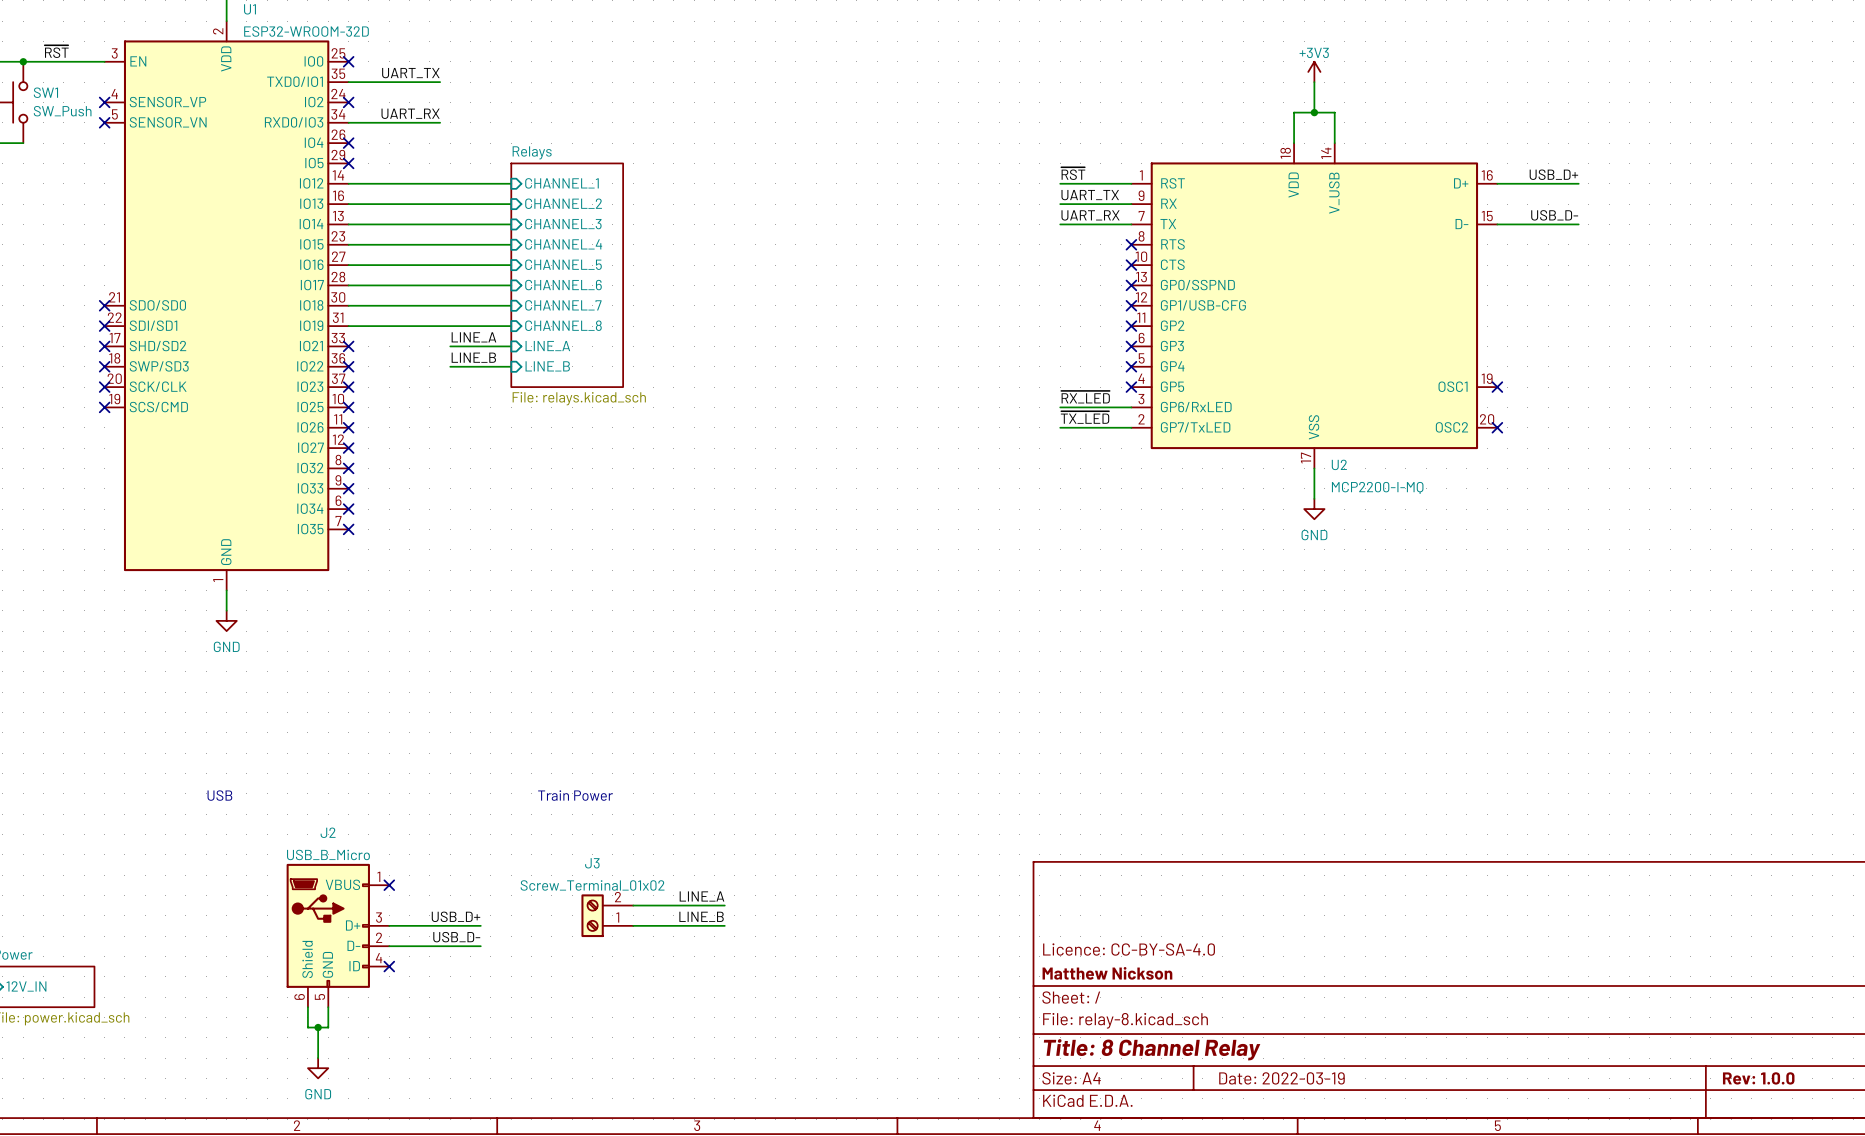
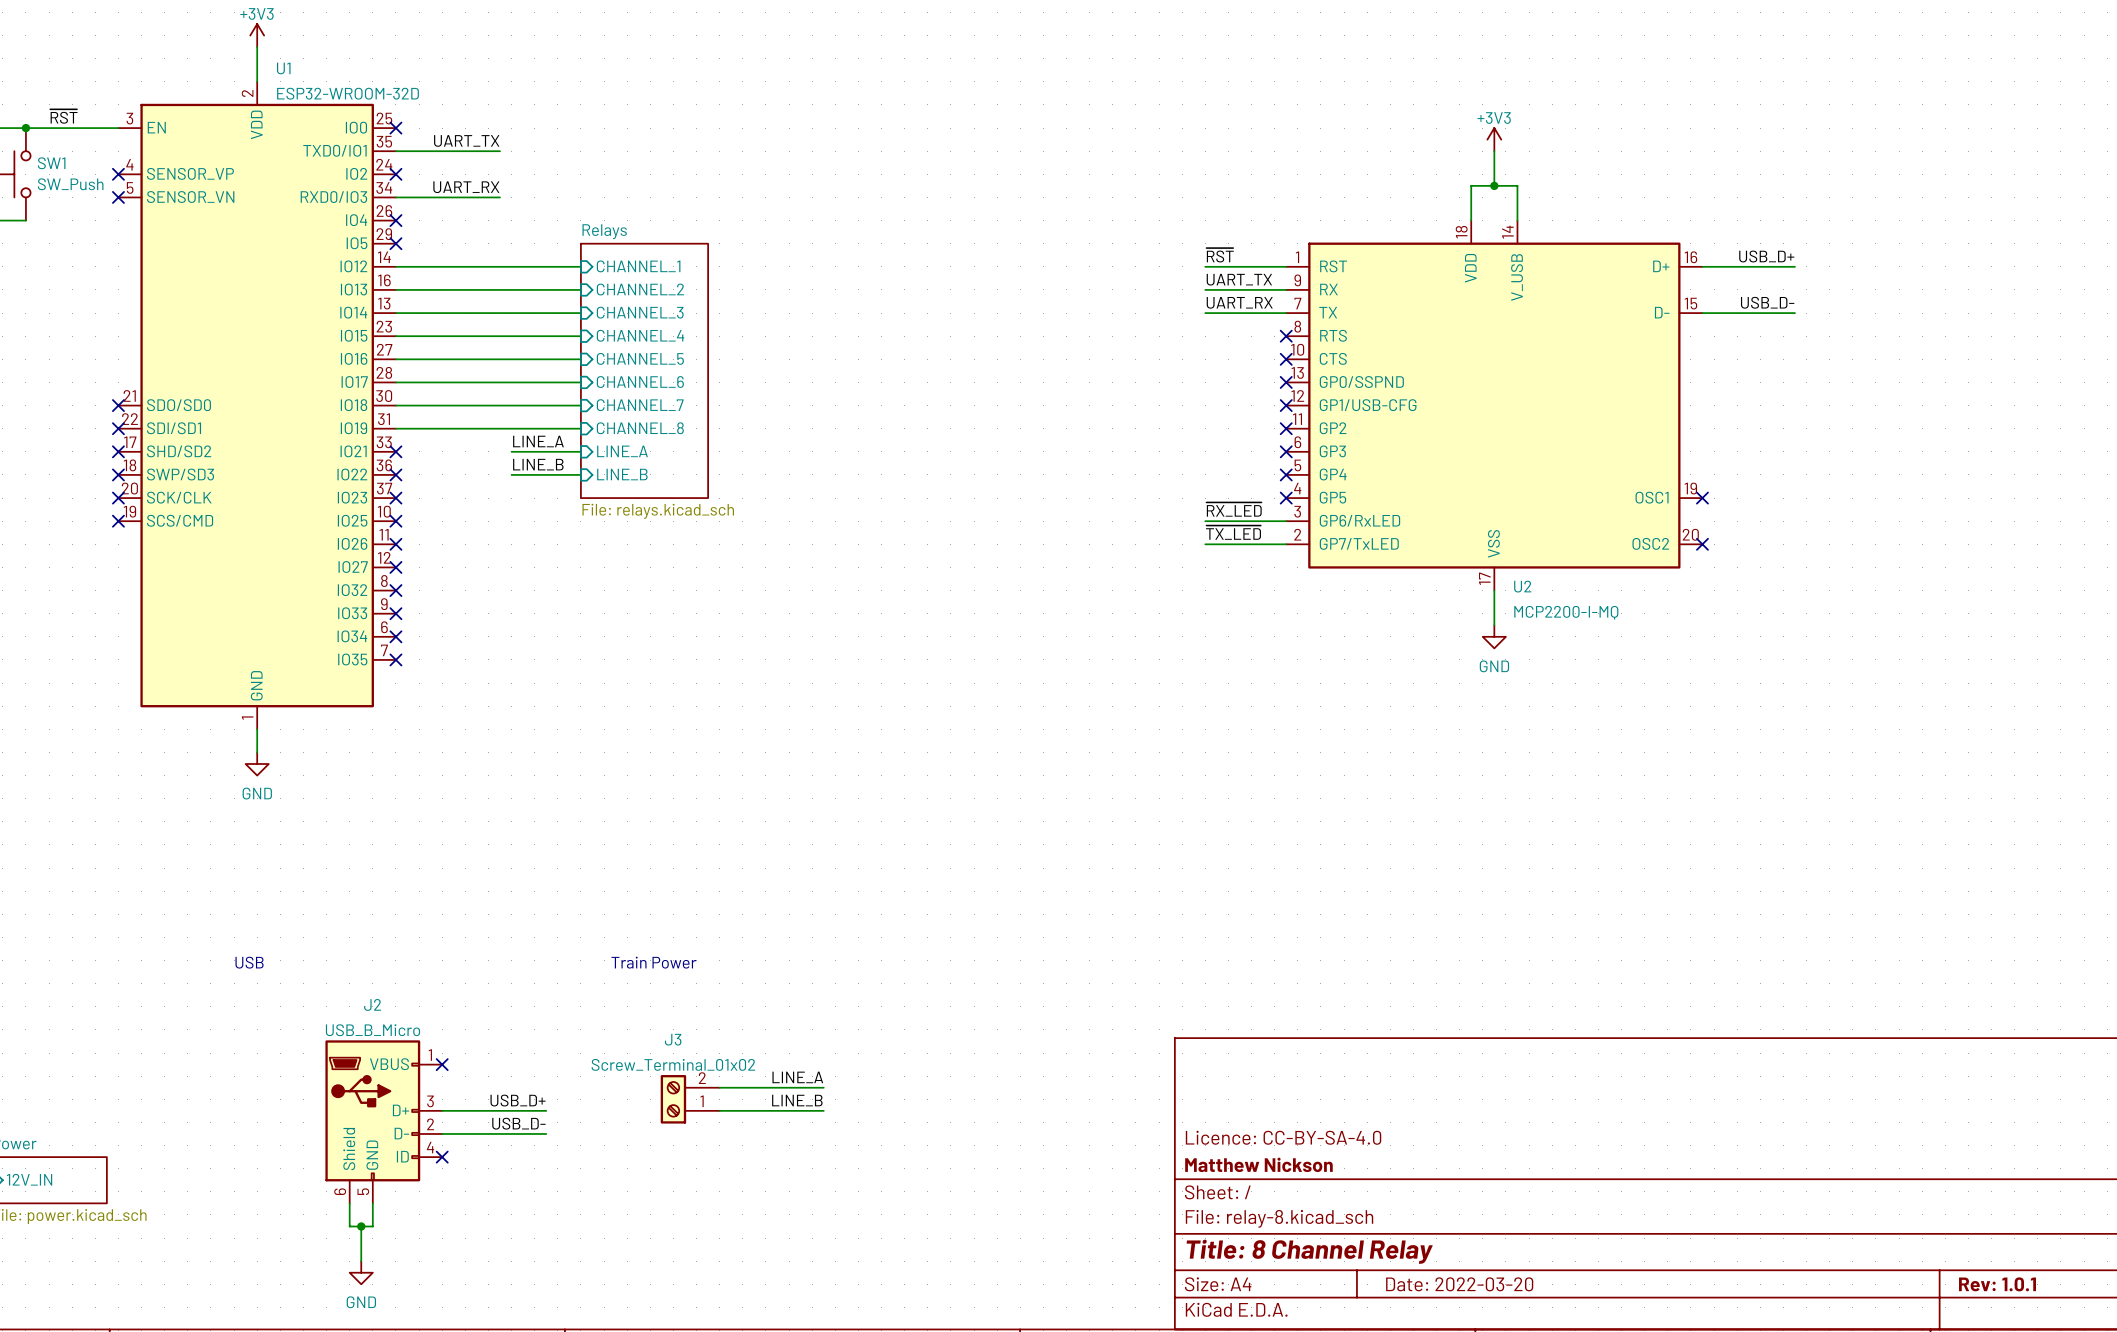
title block: Date: 2022-03-19 (1281, 1078) -> Date: 2022-03-20 (1459, 1284)
title block: Rev: 1.0.0 (1758, 1078) -> Rev: 1.0.1 (1997, 1284)

